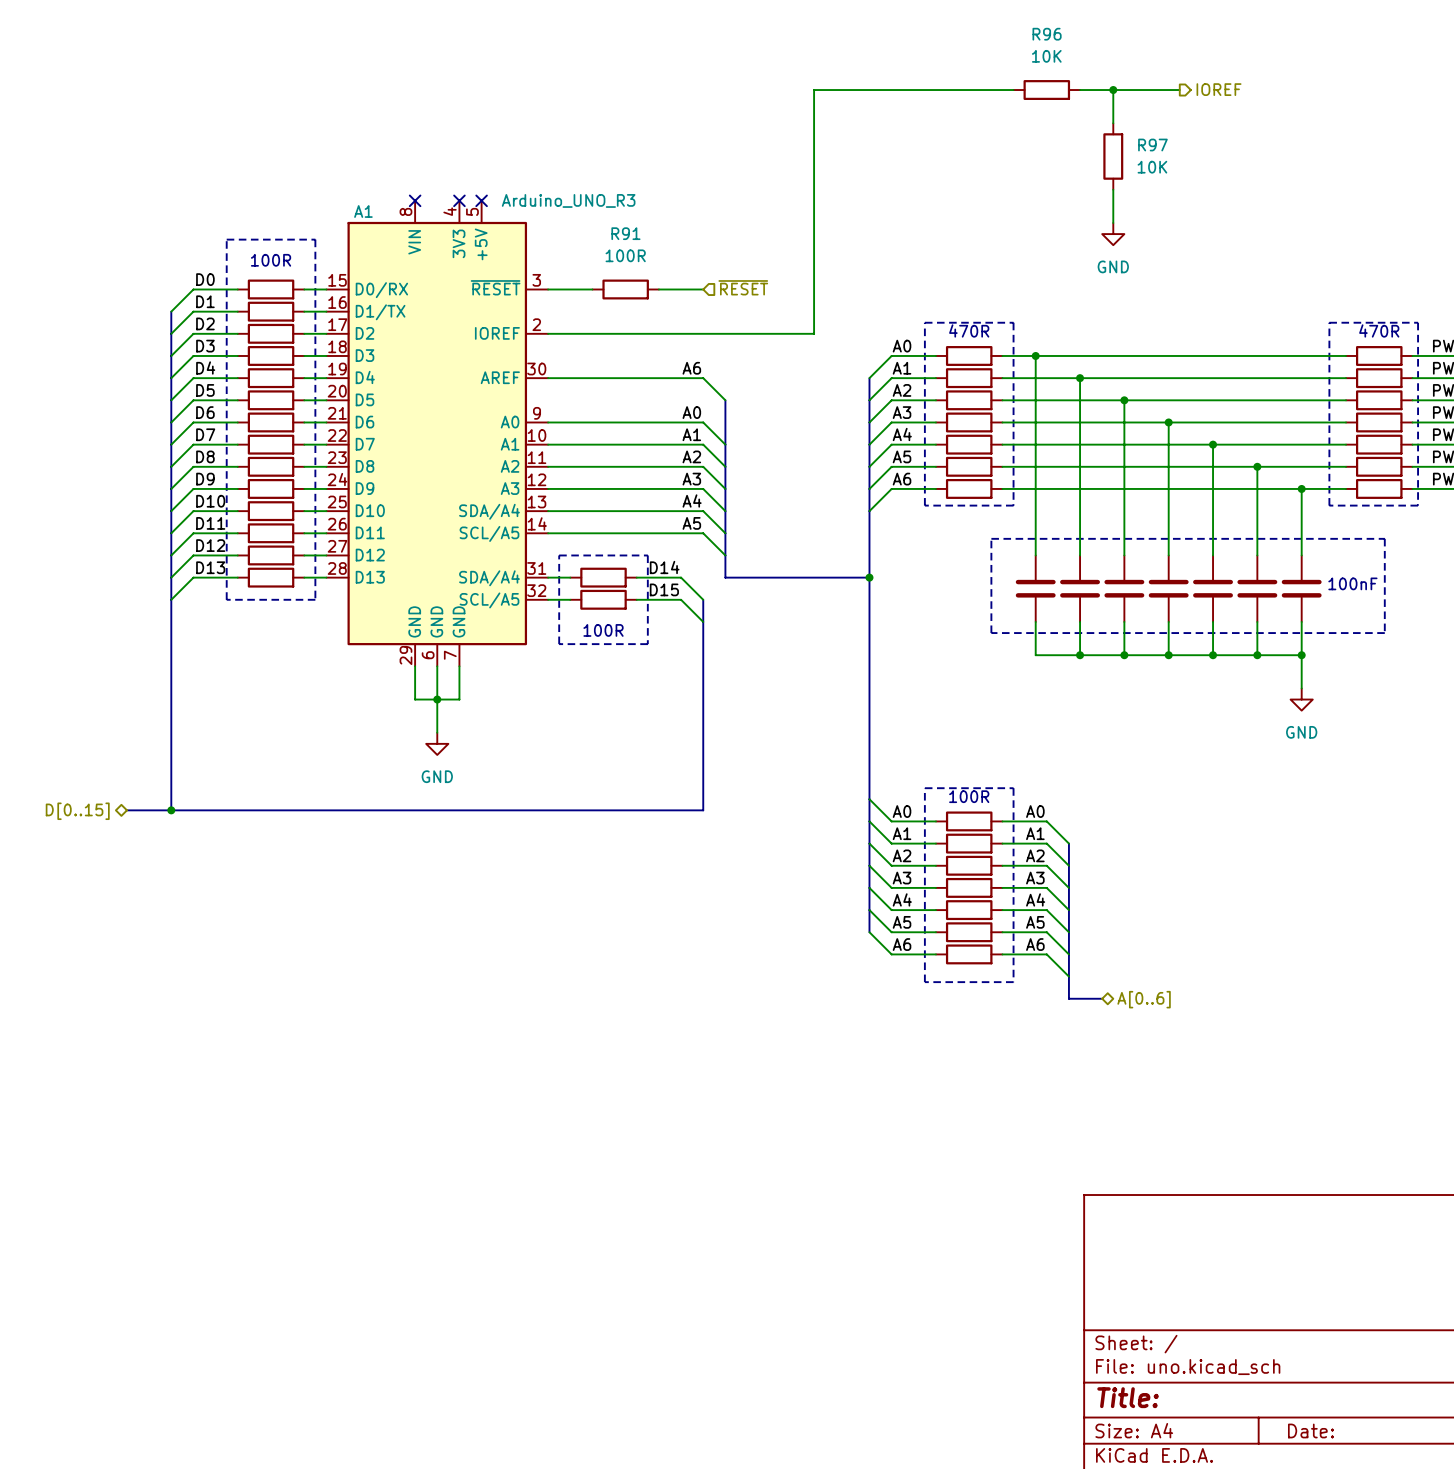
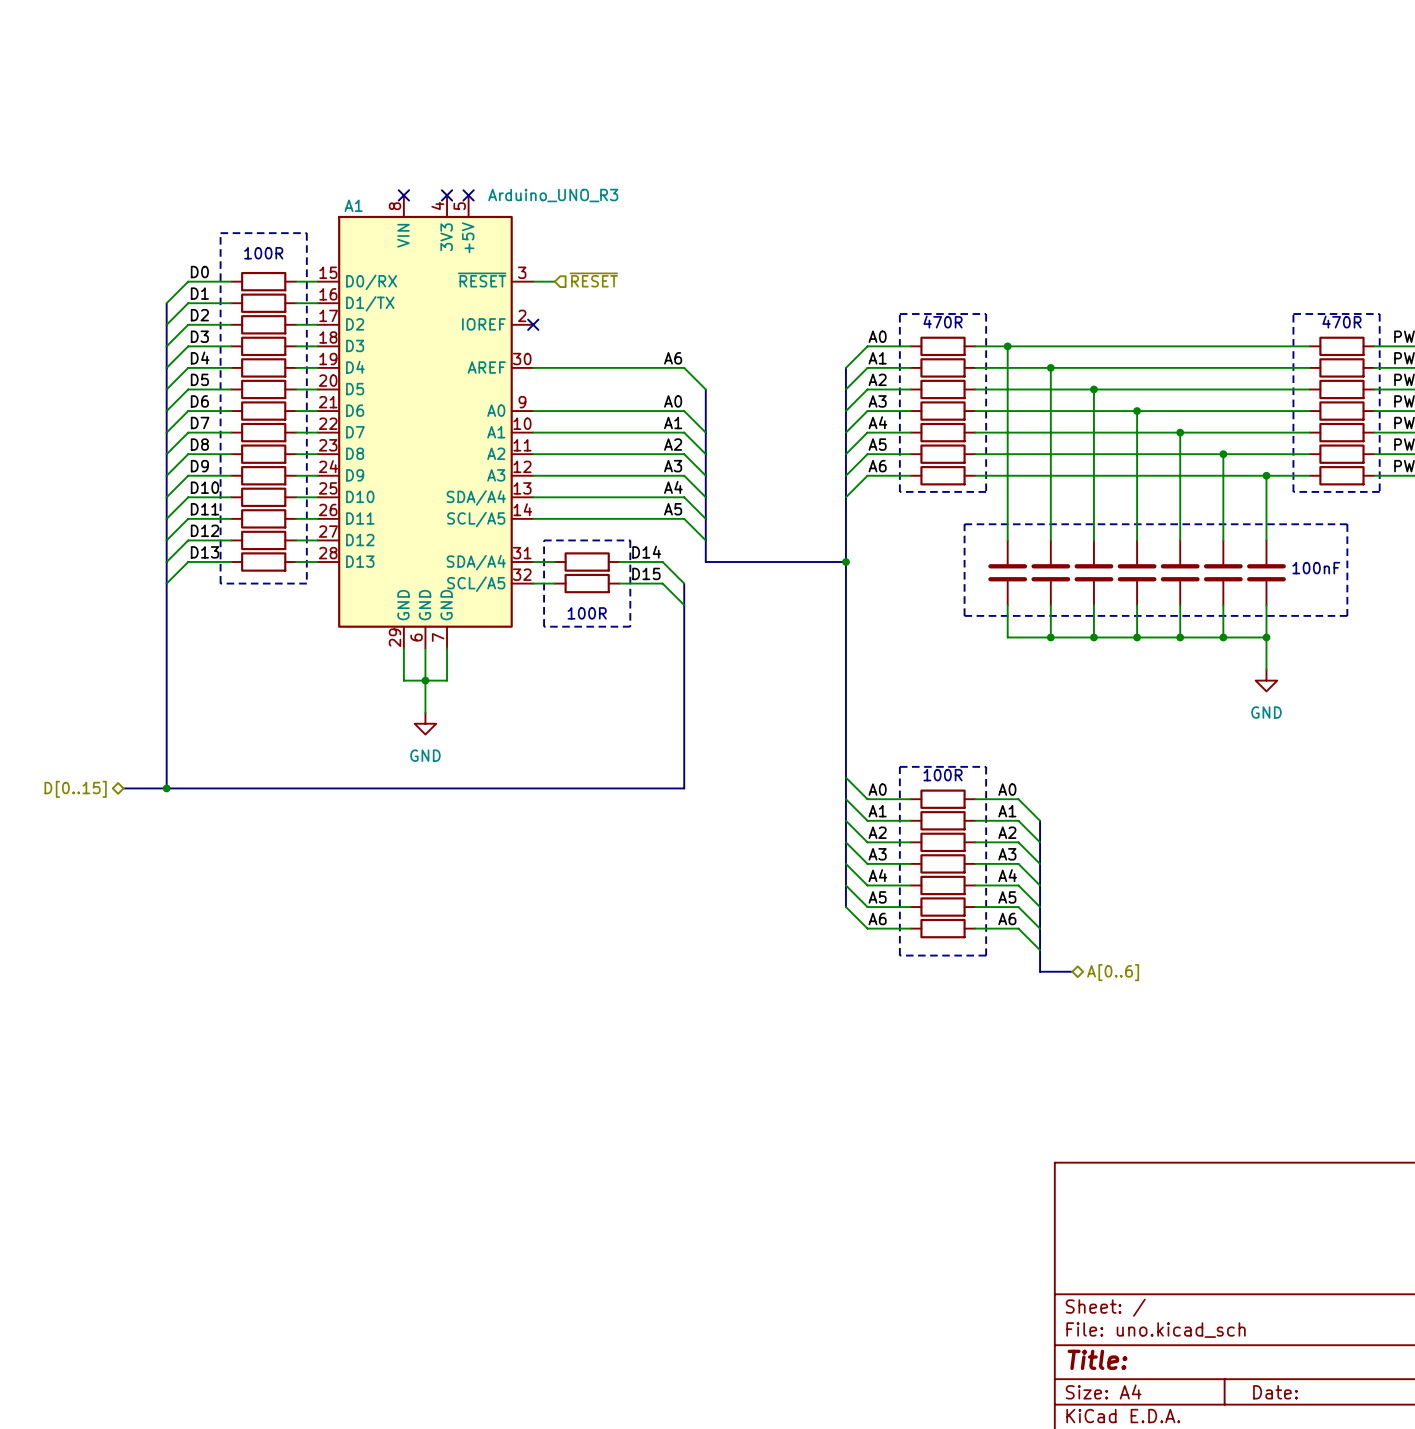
hierarchical label: IOREF (1219, 89) -> none
wire: (1013, 90) (814, 90) (814, 333) (548, 333) -> none
R96: 10K (1046, 90) -> none
wire: (1080, 90) (1179, 90) -> none
wire: (1113, 90) (1113, 123) -> none
junction: (1113, 90) -> none
R97: 10K (1113, 156) -> none
wire: (1113, 189) (1113, 223) -> none
power symbol: GND (1113, 234) -> none
hierarchical label position: ~{RESET} (743, 287) -> ~{RESET} (593, 280)
wire: (570, 289) (592, 289) -> none
R91: 100R (625, 289) -> none
wire: (658, 289) (703, 289) -> none
no-connect mark: none -> (533, 324)

